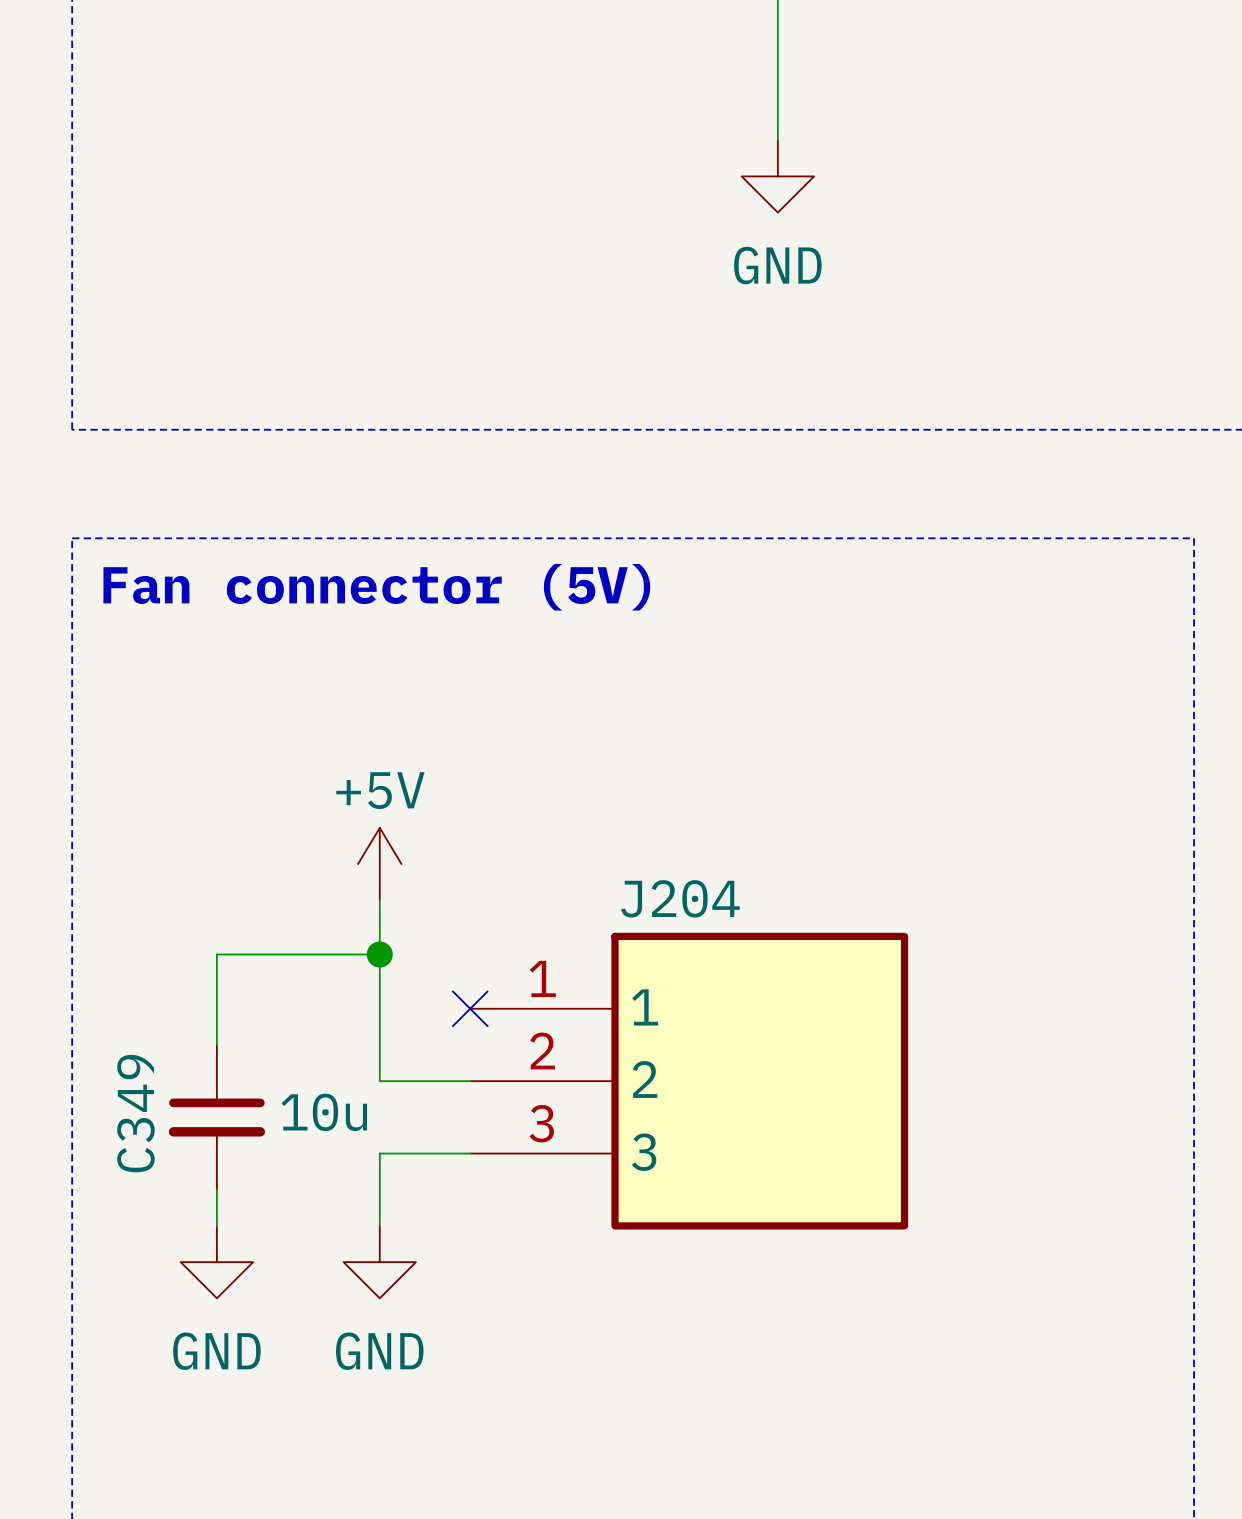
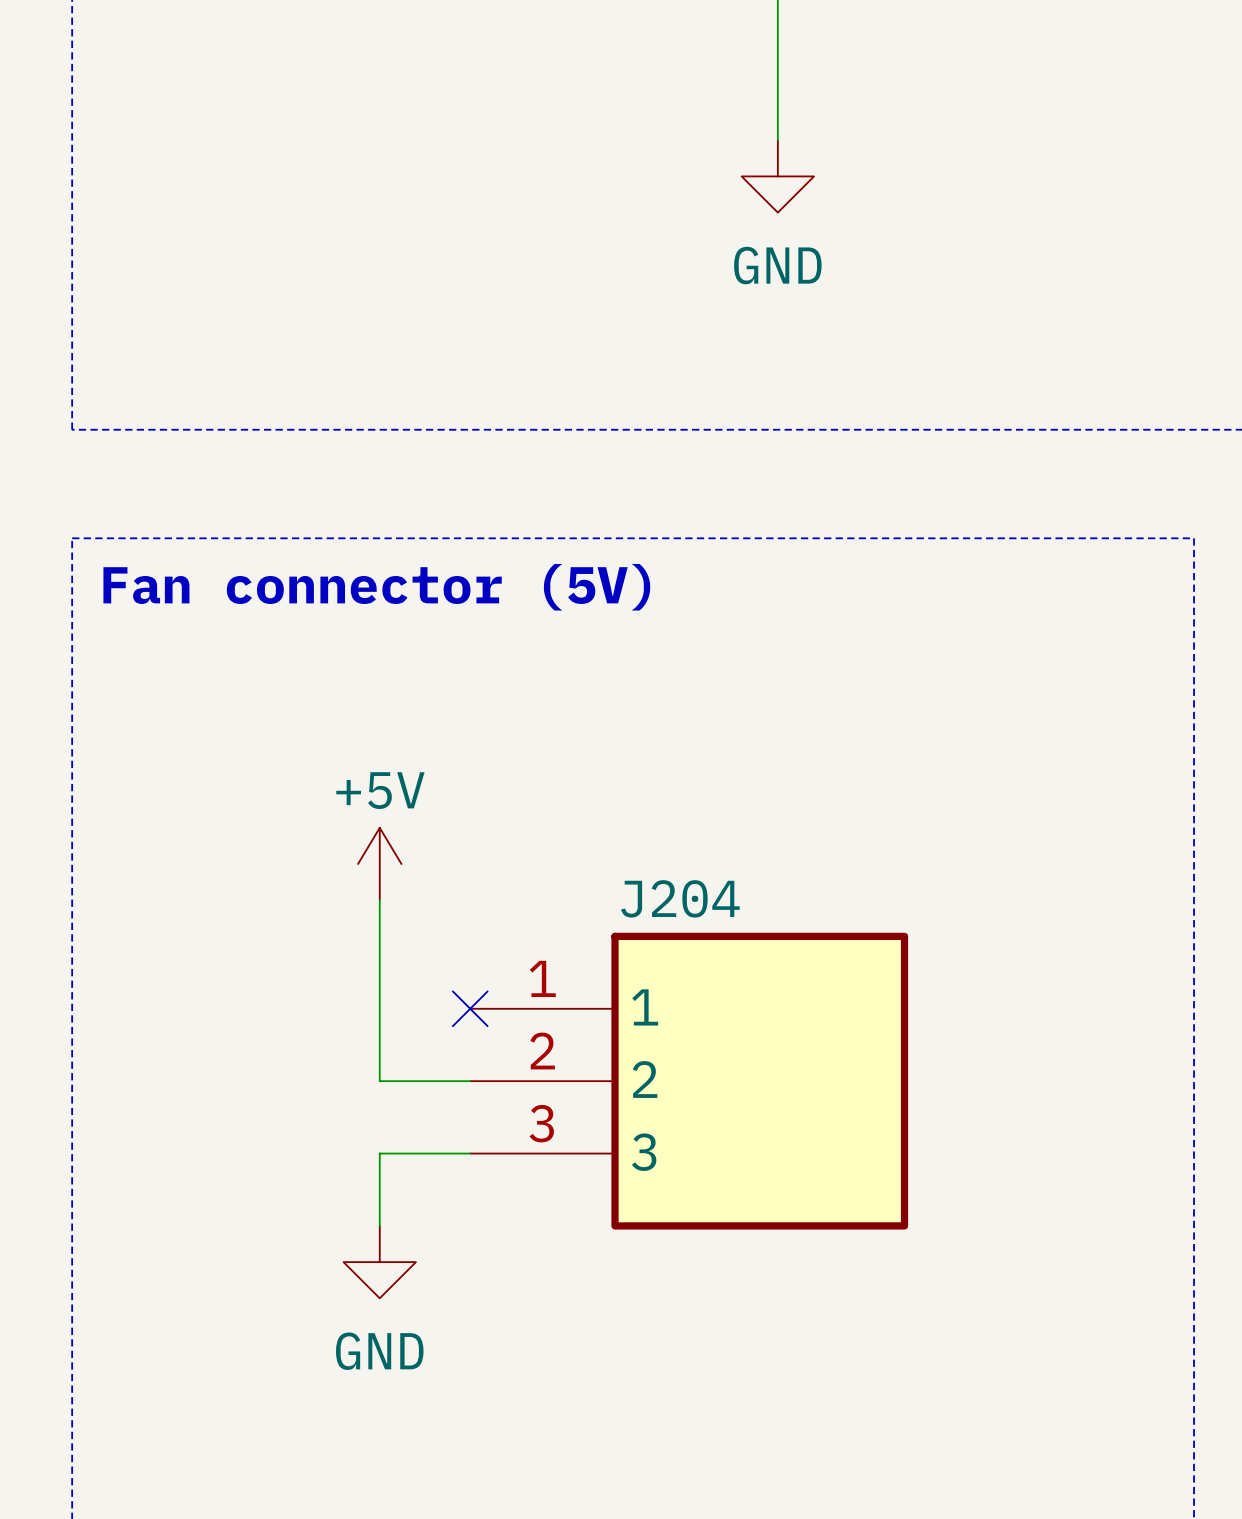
wire: (379, 954) (216, 954) (216, 1044) -> none
junction: (379, 954) -> none
C349: 10u (216, 1117) -> none
wire: (216, 1189) (216, 1225) -> none
power symbol: GND (216, 1262) -> none

